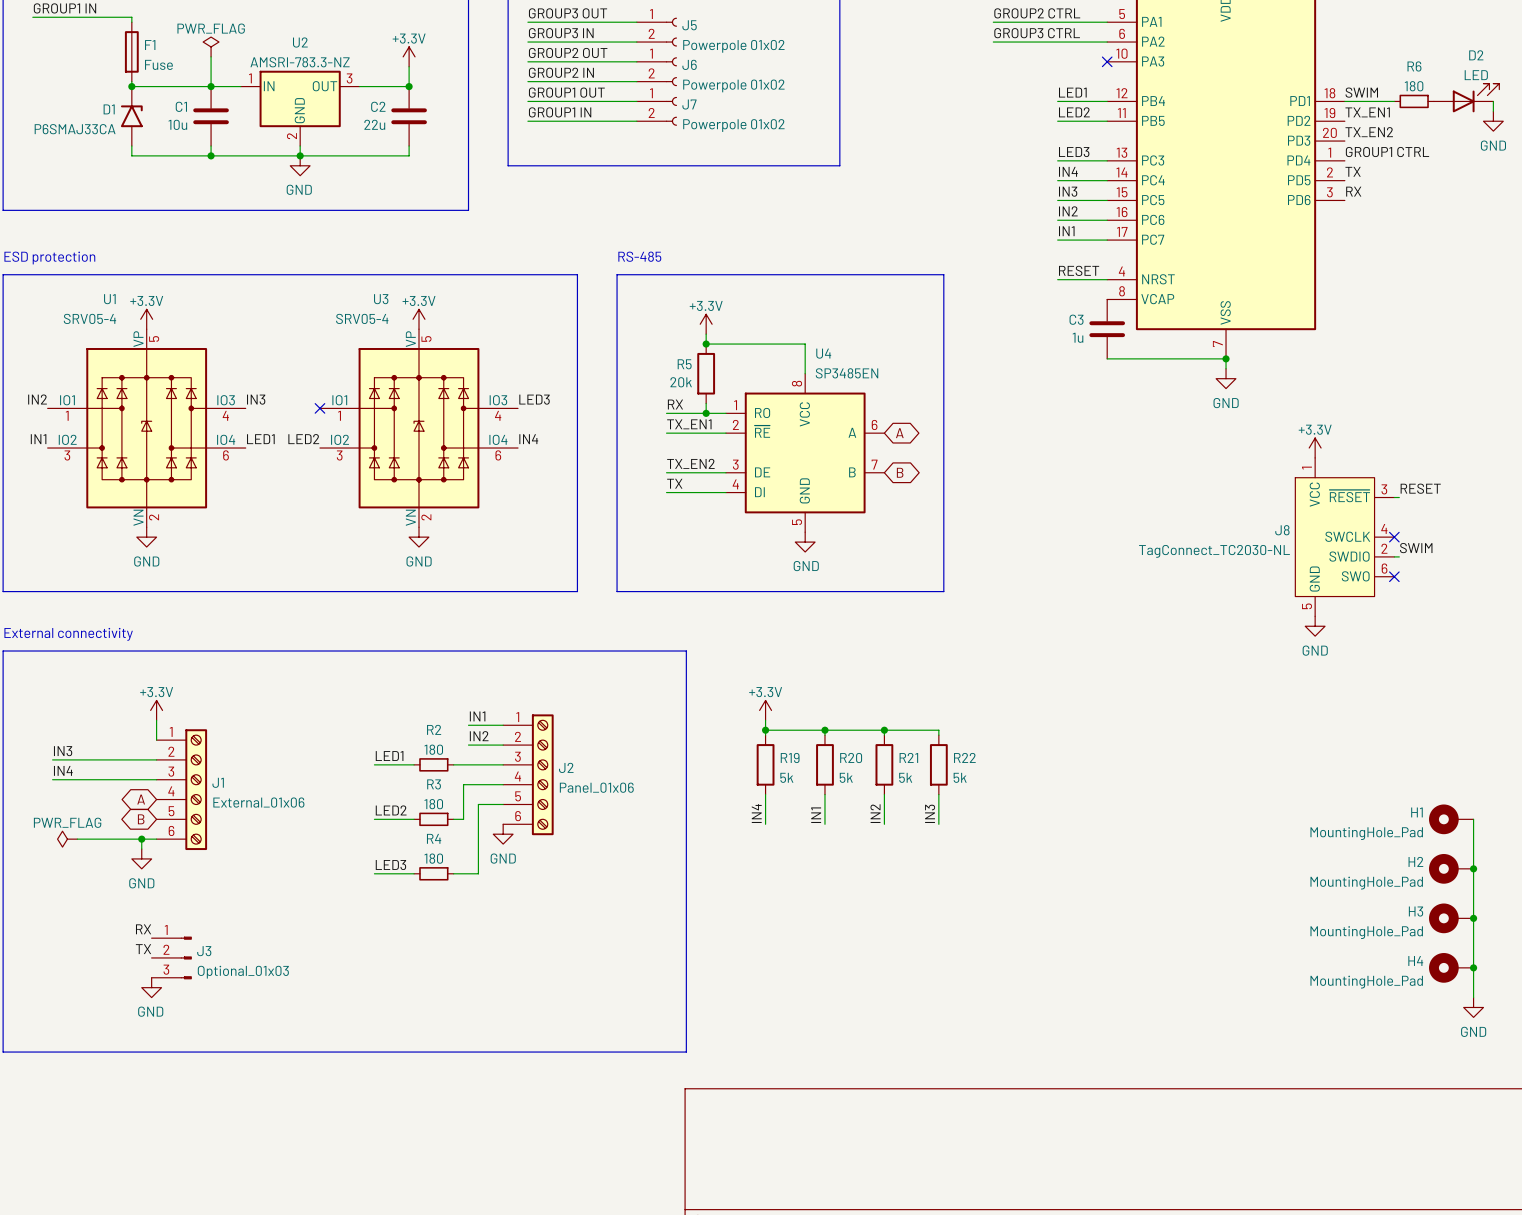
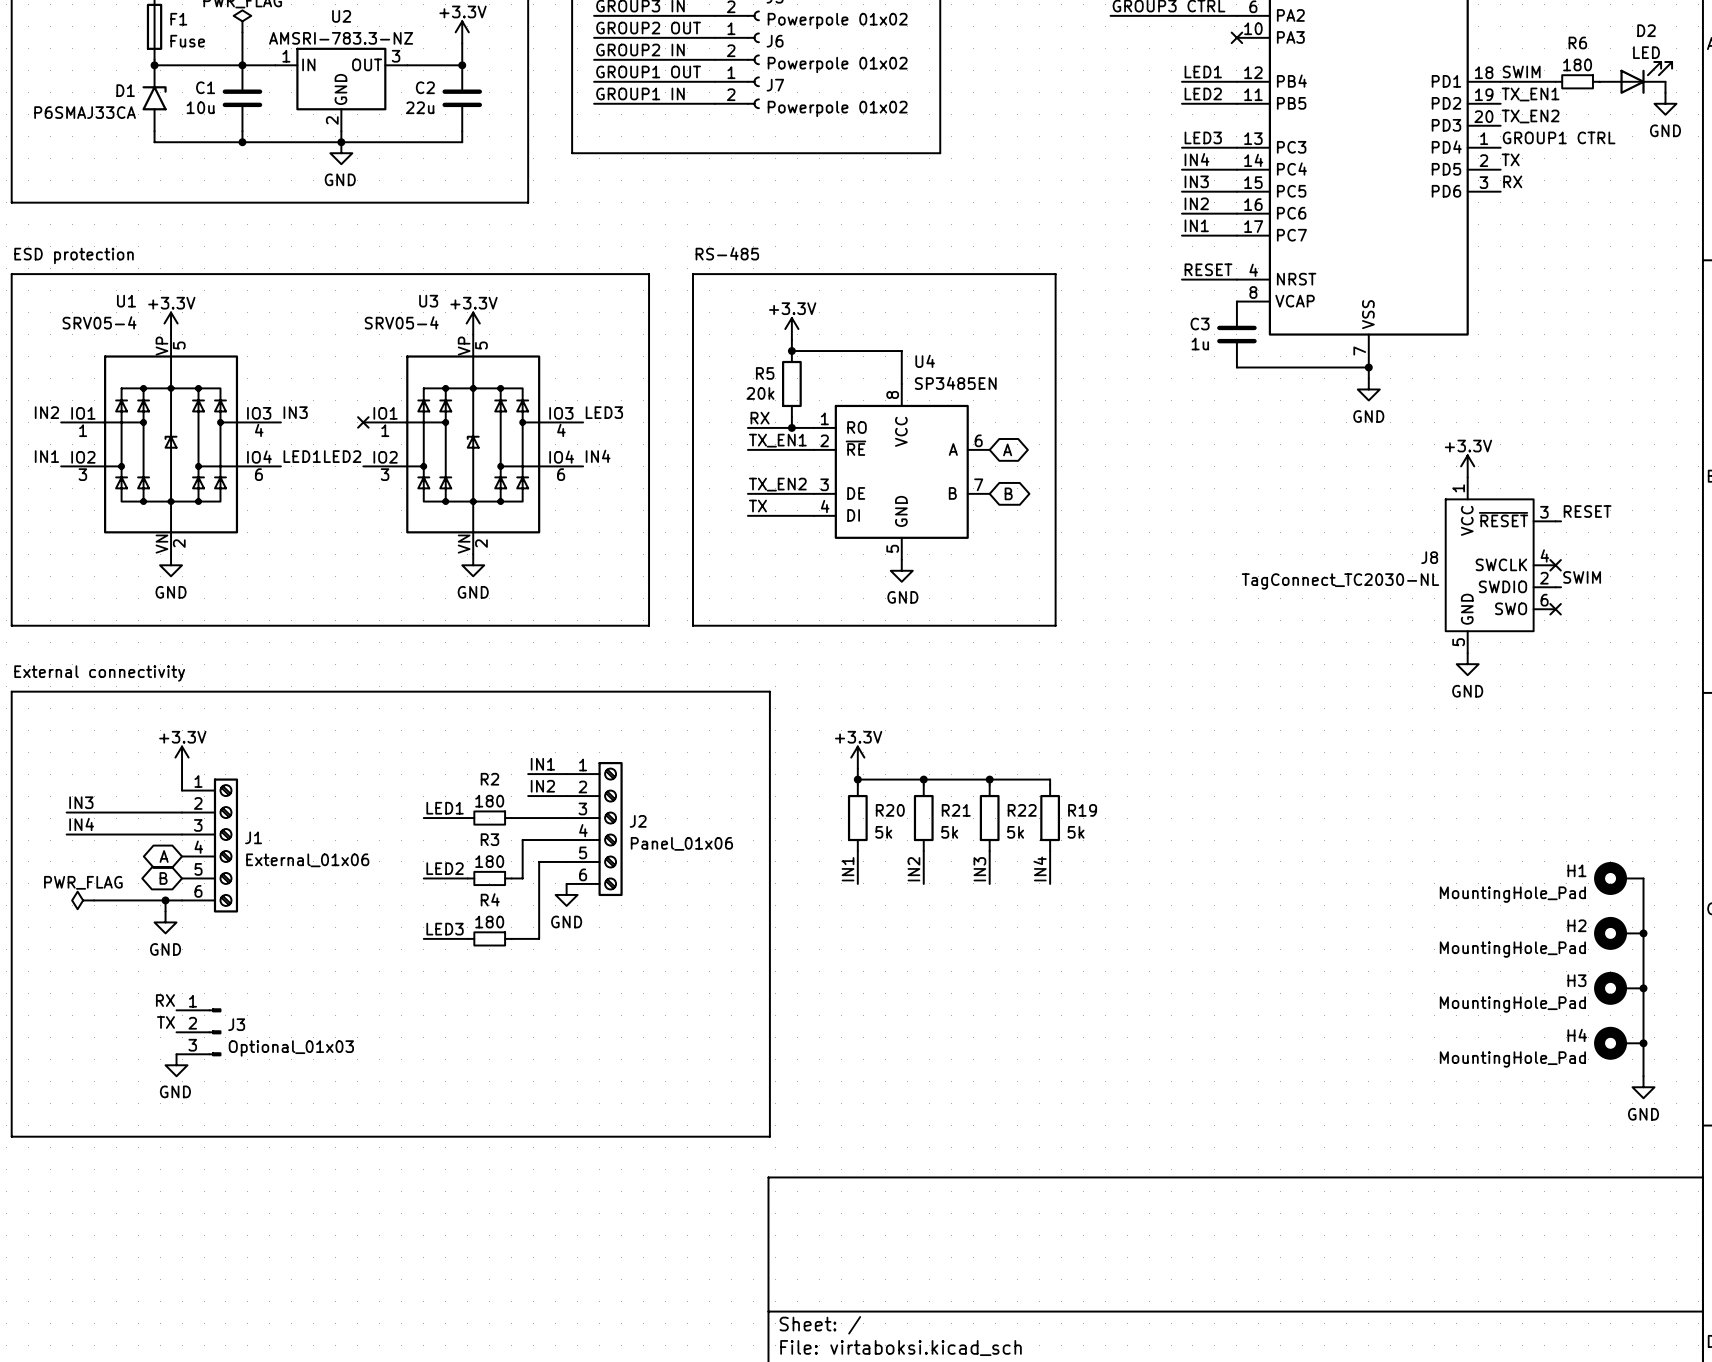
R21 name: R21 (908, 757) -> R22 (1022, 810)
R22 name: R22 (964, 757) -> R19 (1082, 810)
R19 name: R19 (790, 758) -> R20 (890, 810)
R20 name: R20 (851, 758) -> R21 (956, 810)
label: IN4 (756, 813) -> IN1 (848, 869)
label: IN2 (875, 813) -> IN3 (979, 869)
label: IN3 (930, 813) -> IN4 (1040, 868)
label: IN1 (816, 815) -> IN2 (913, 869)

